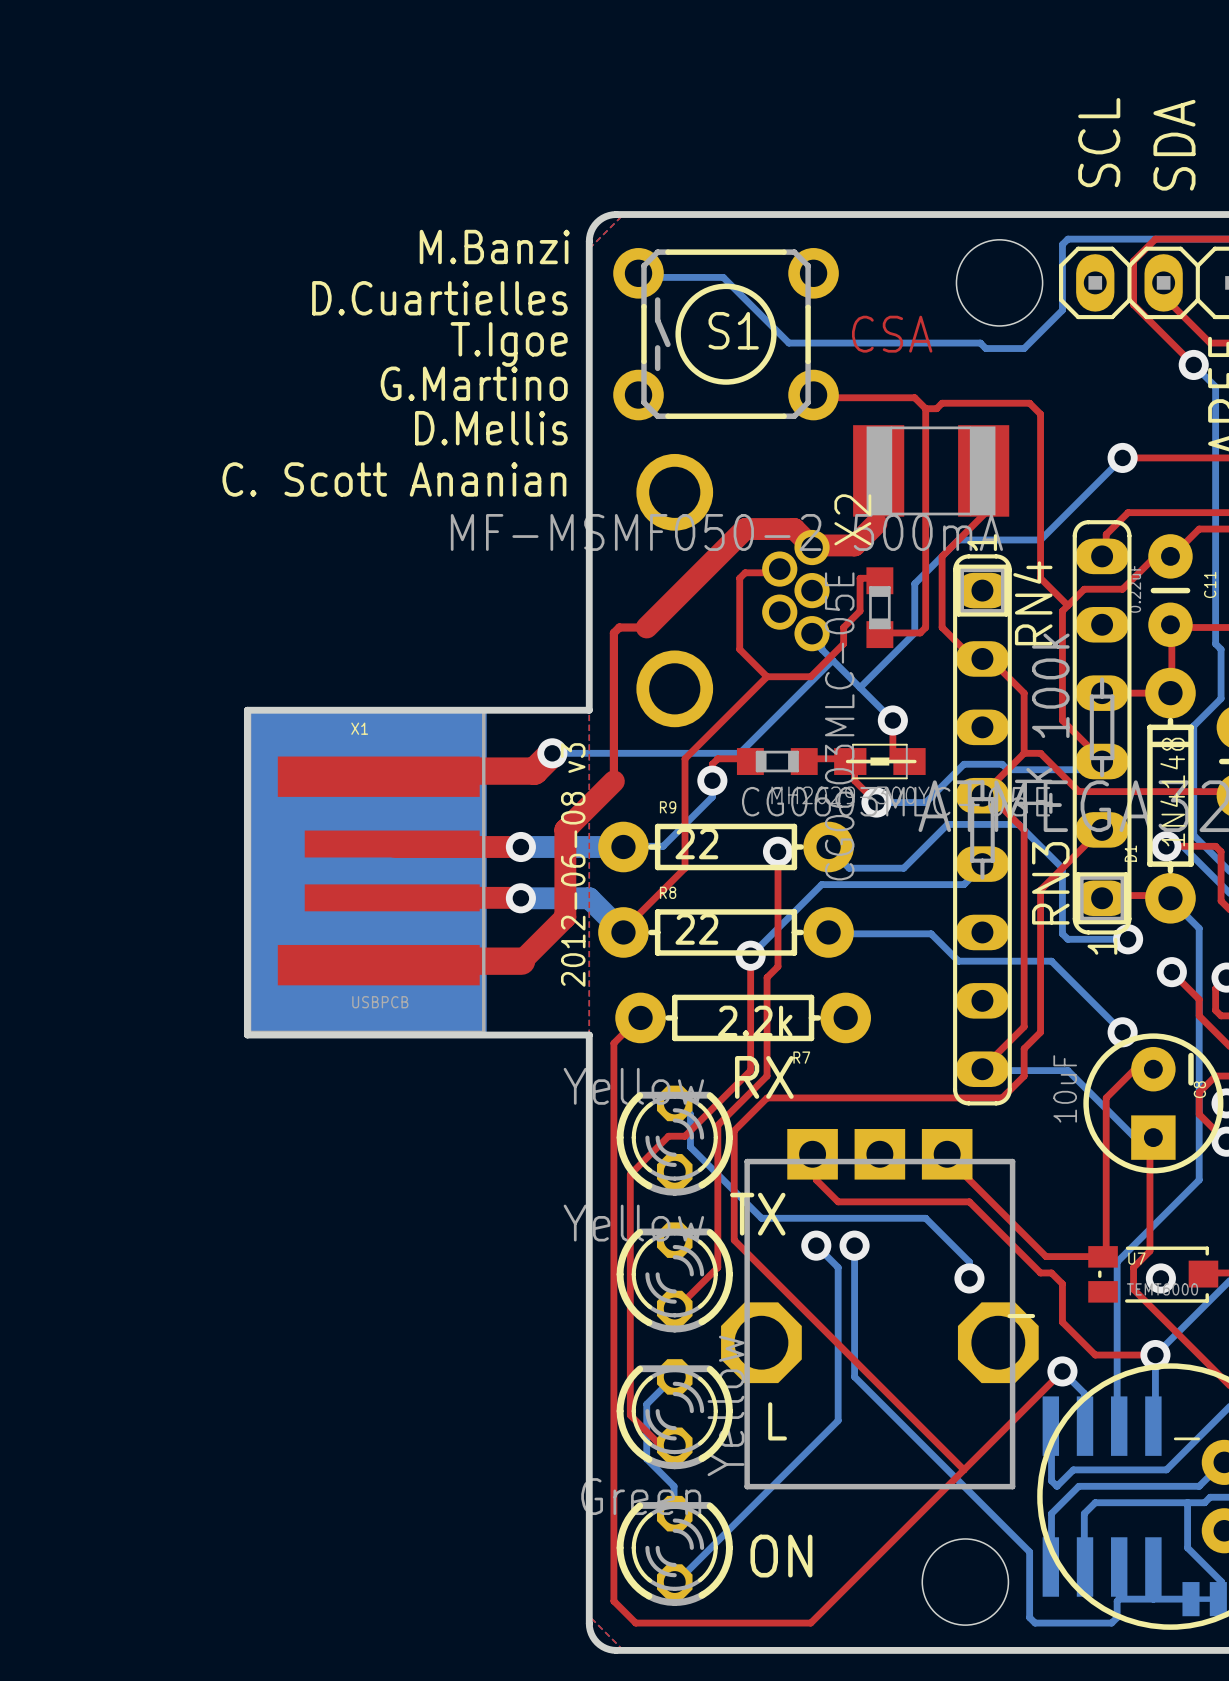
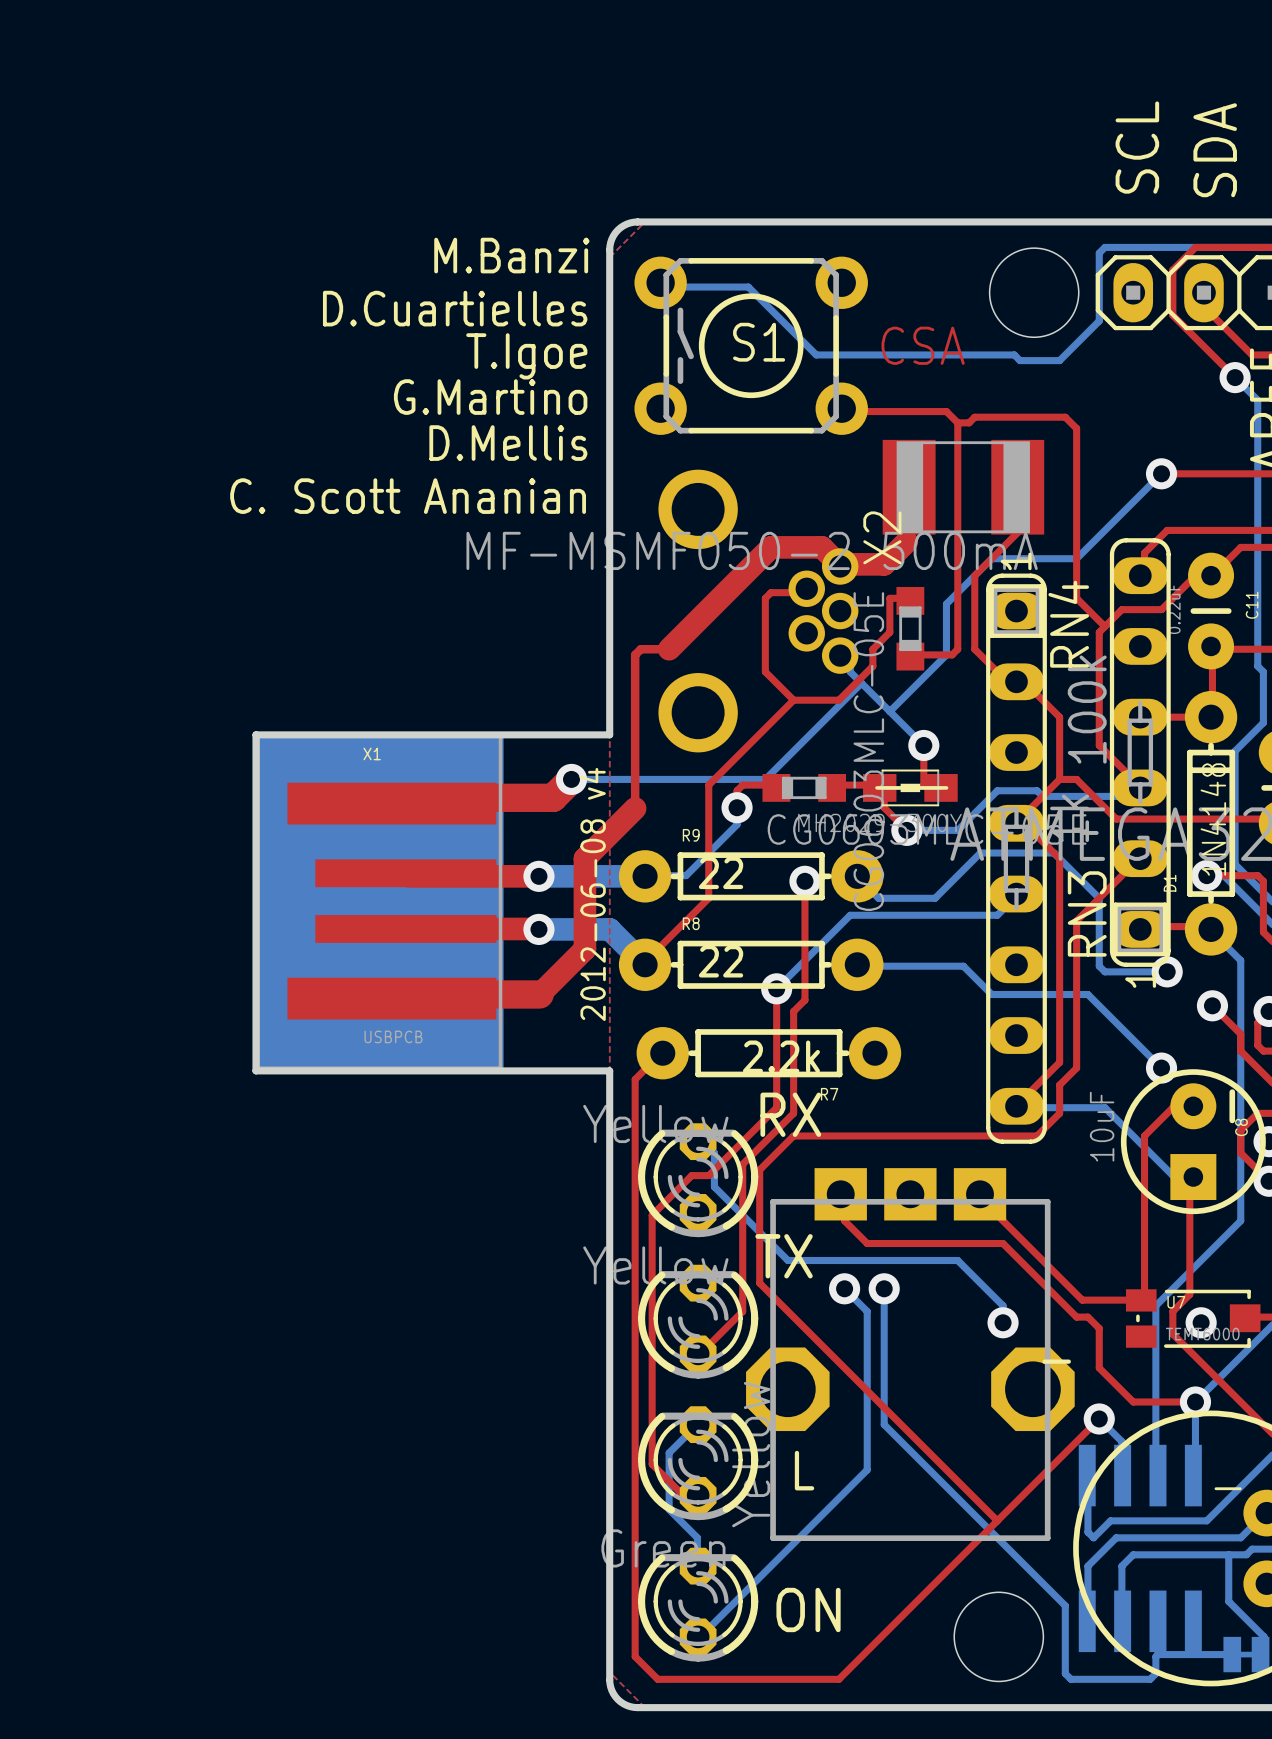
text: 2012-06-08 v3 (573, 864) -> 2012-06-08 v4 (592, 894)

